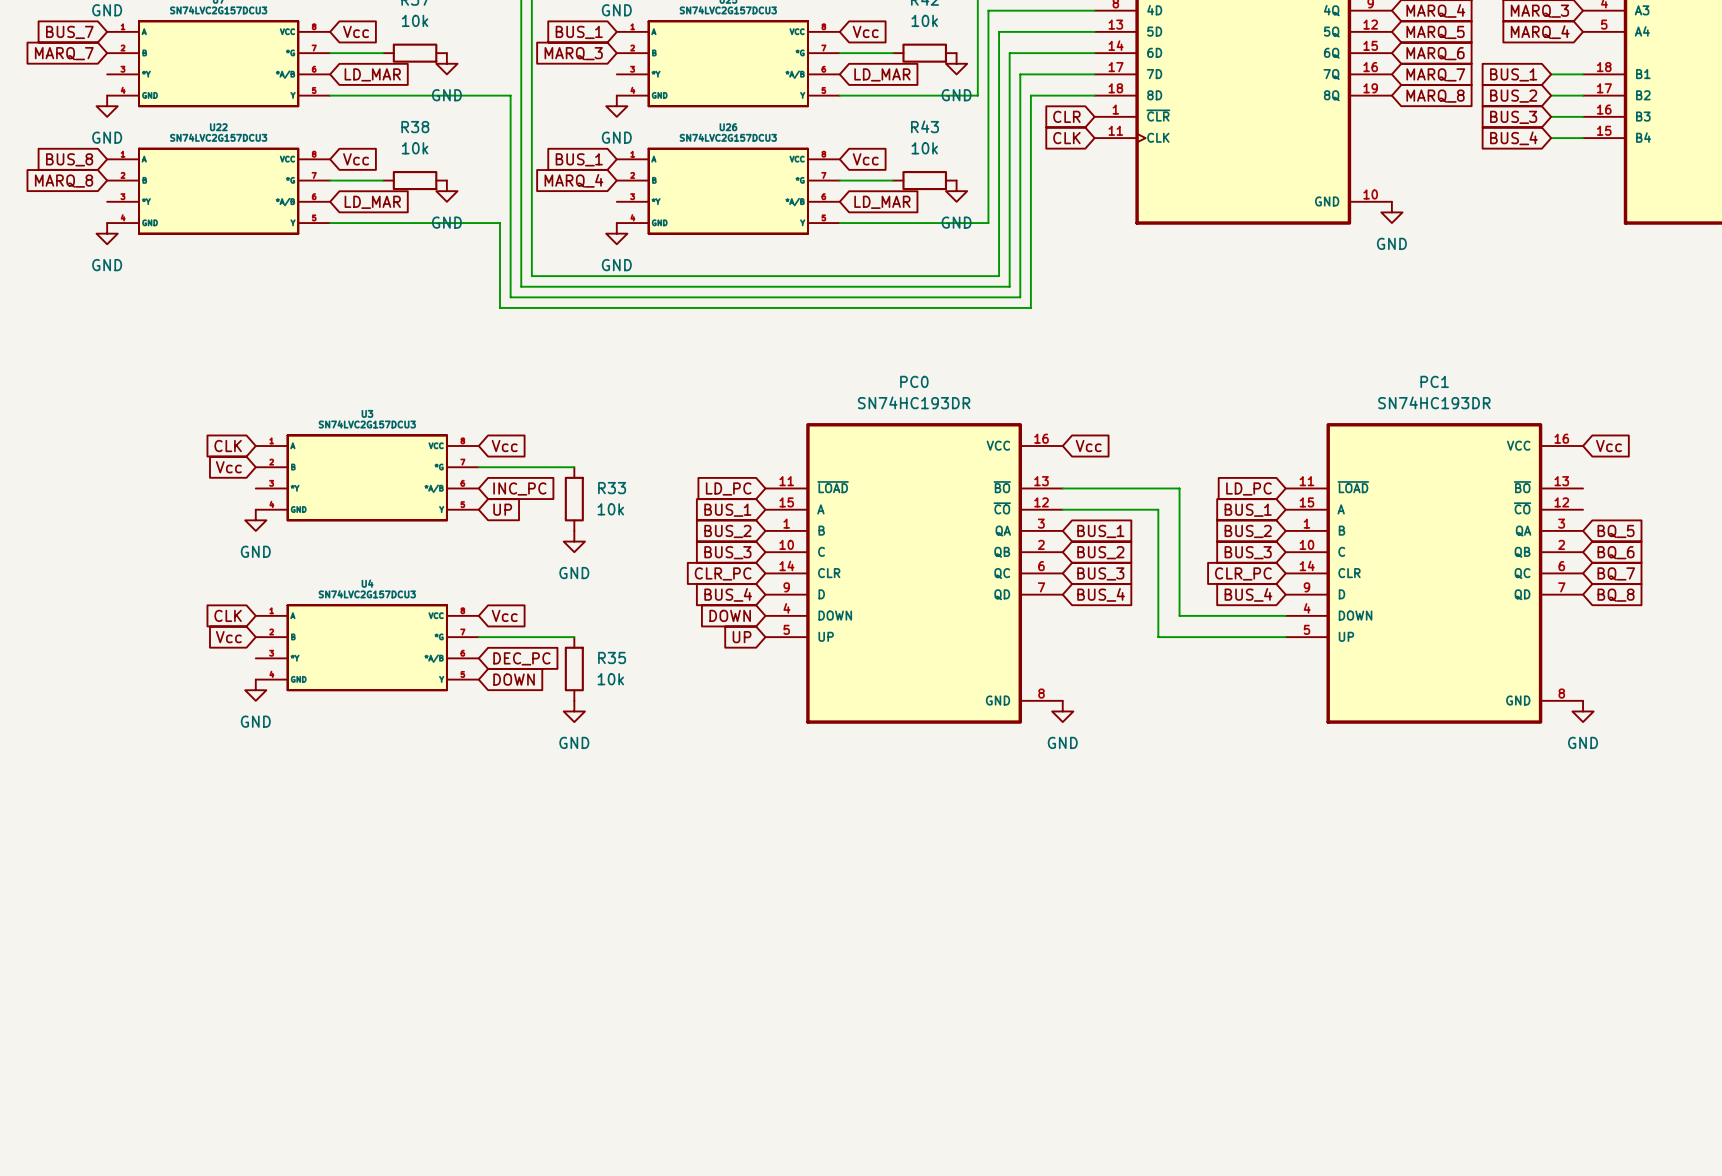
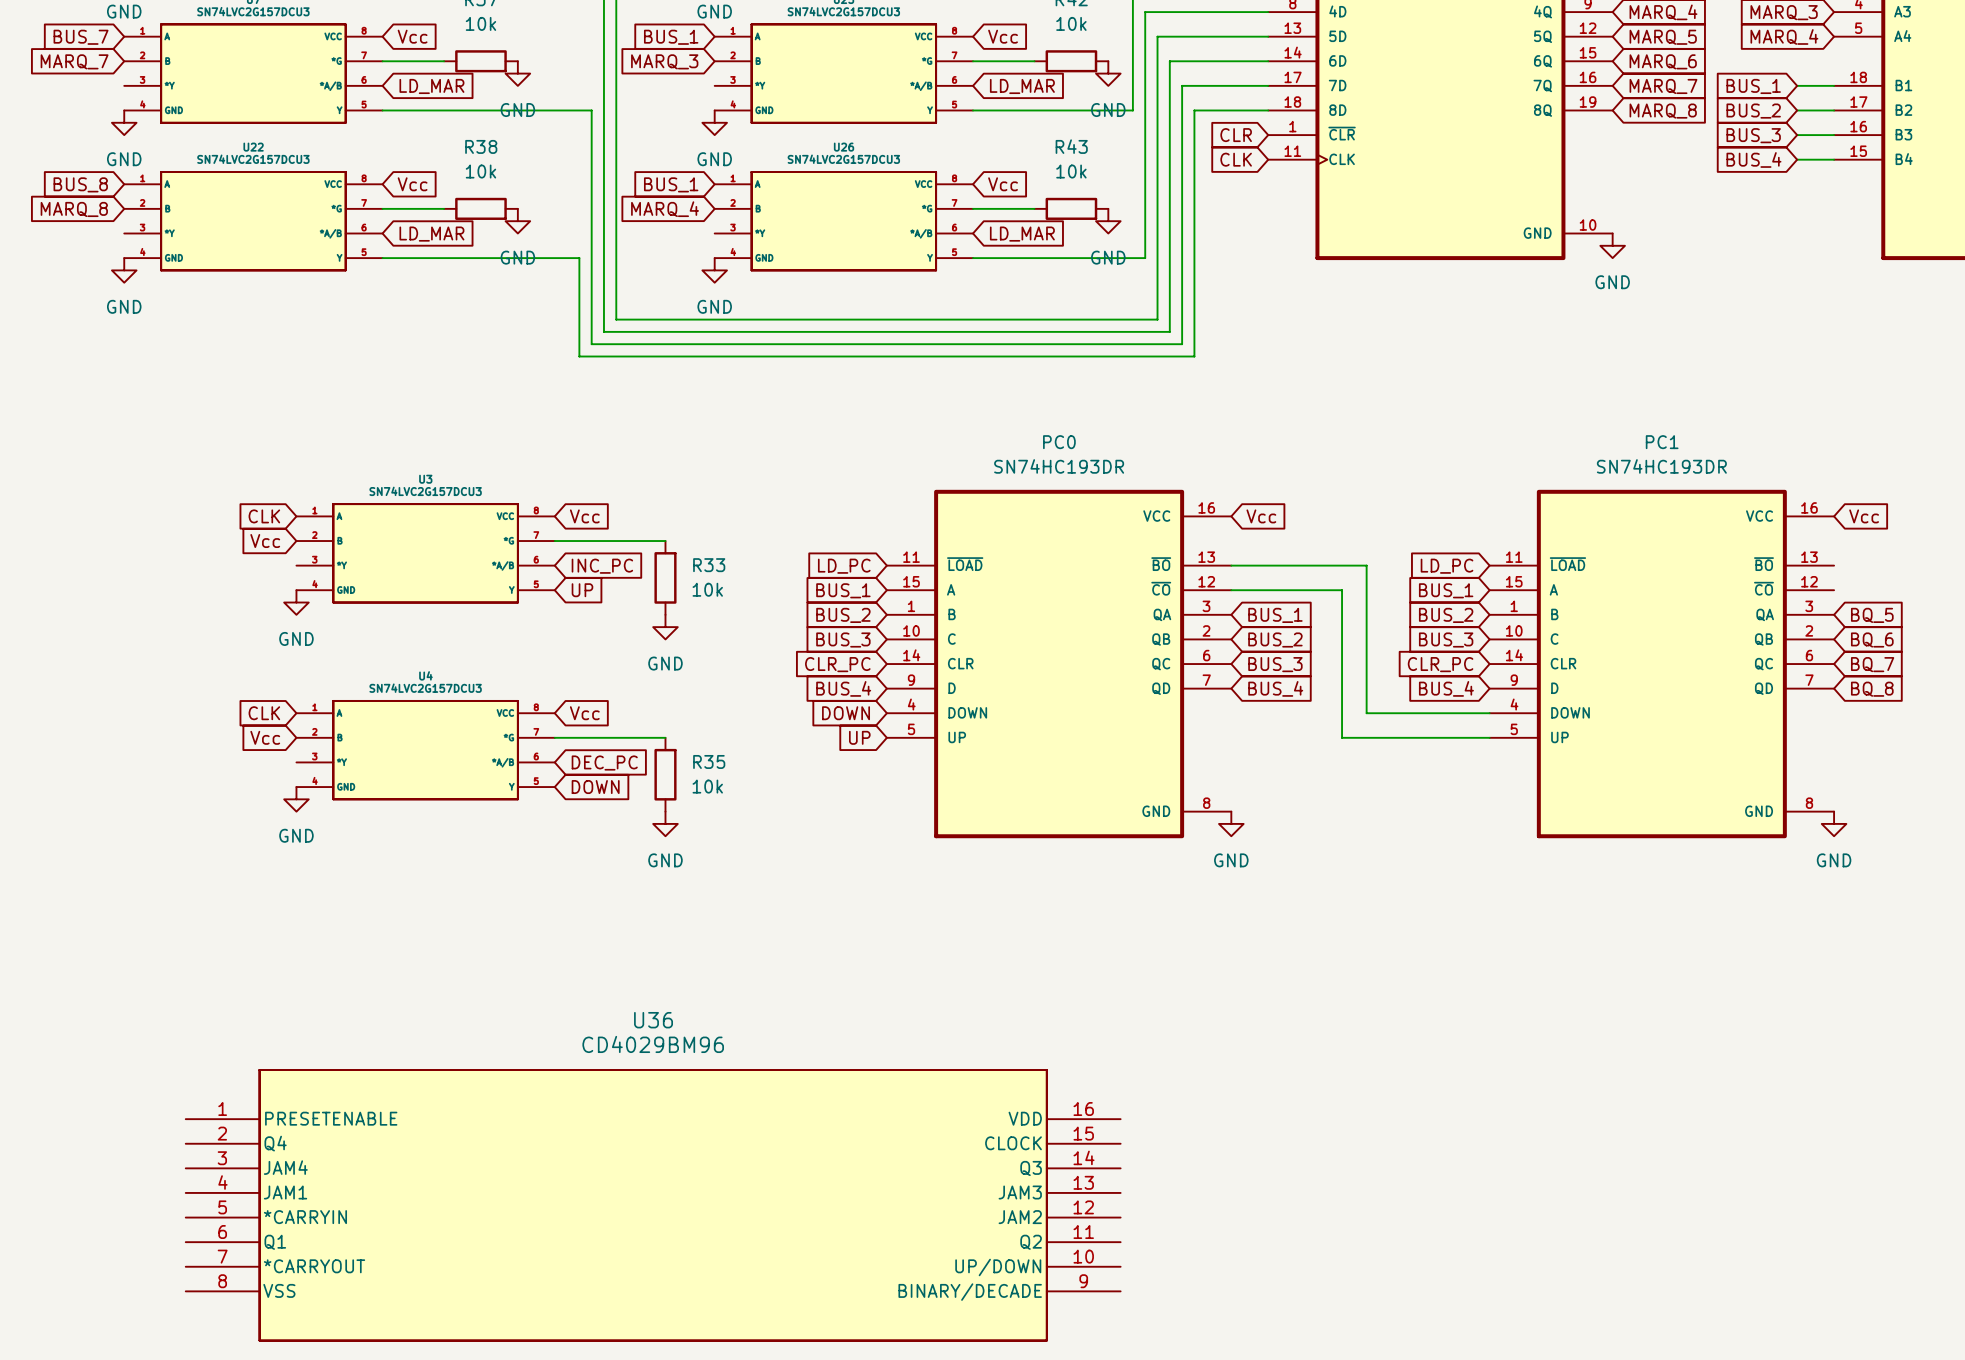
U36: none -> CD4029BM96 (653, 1205)

